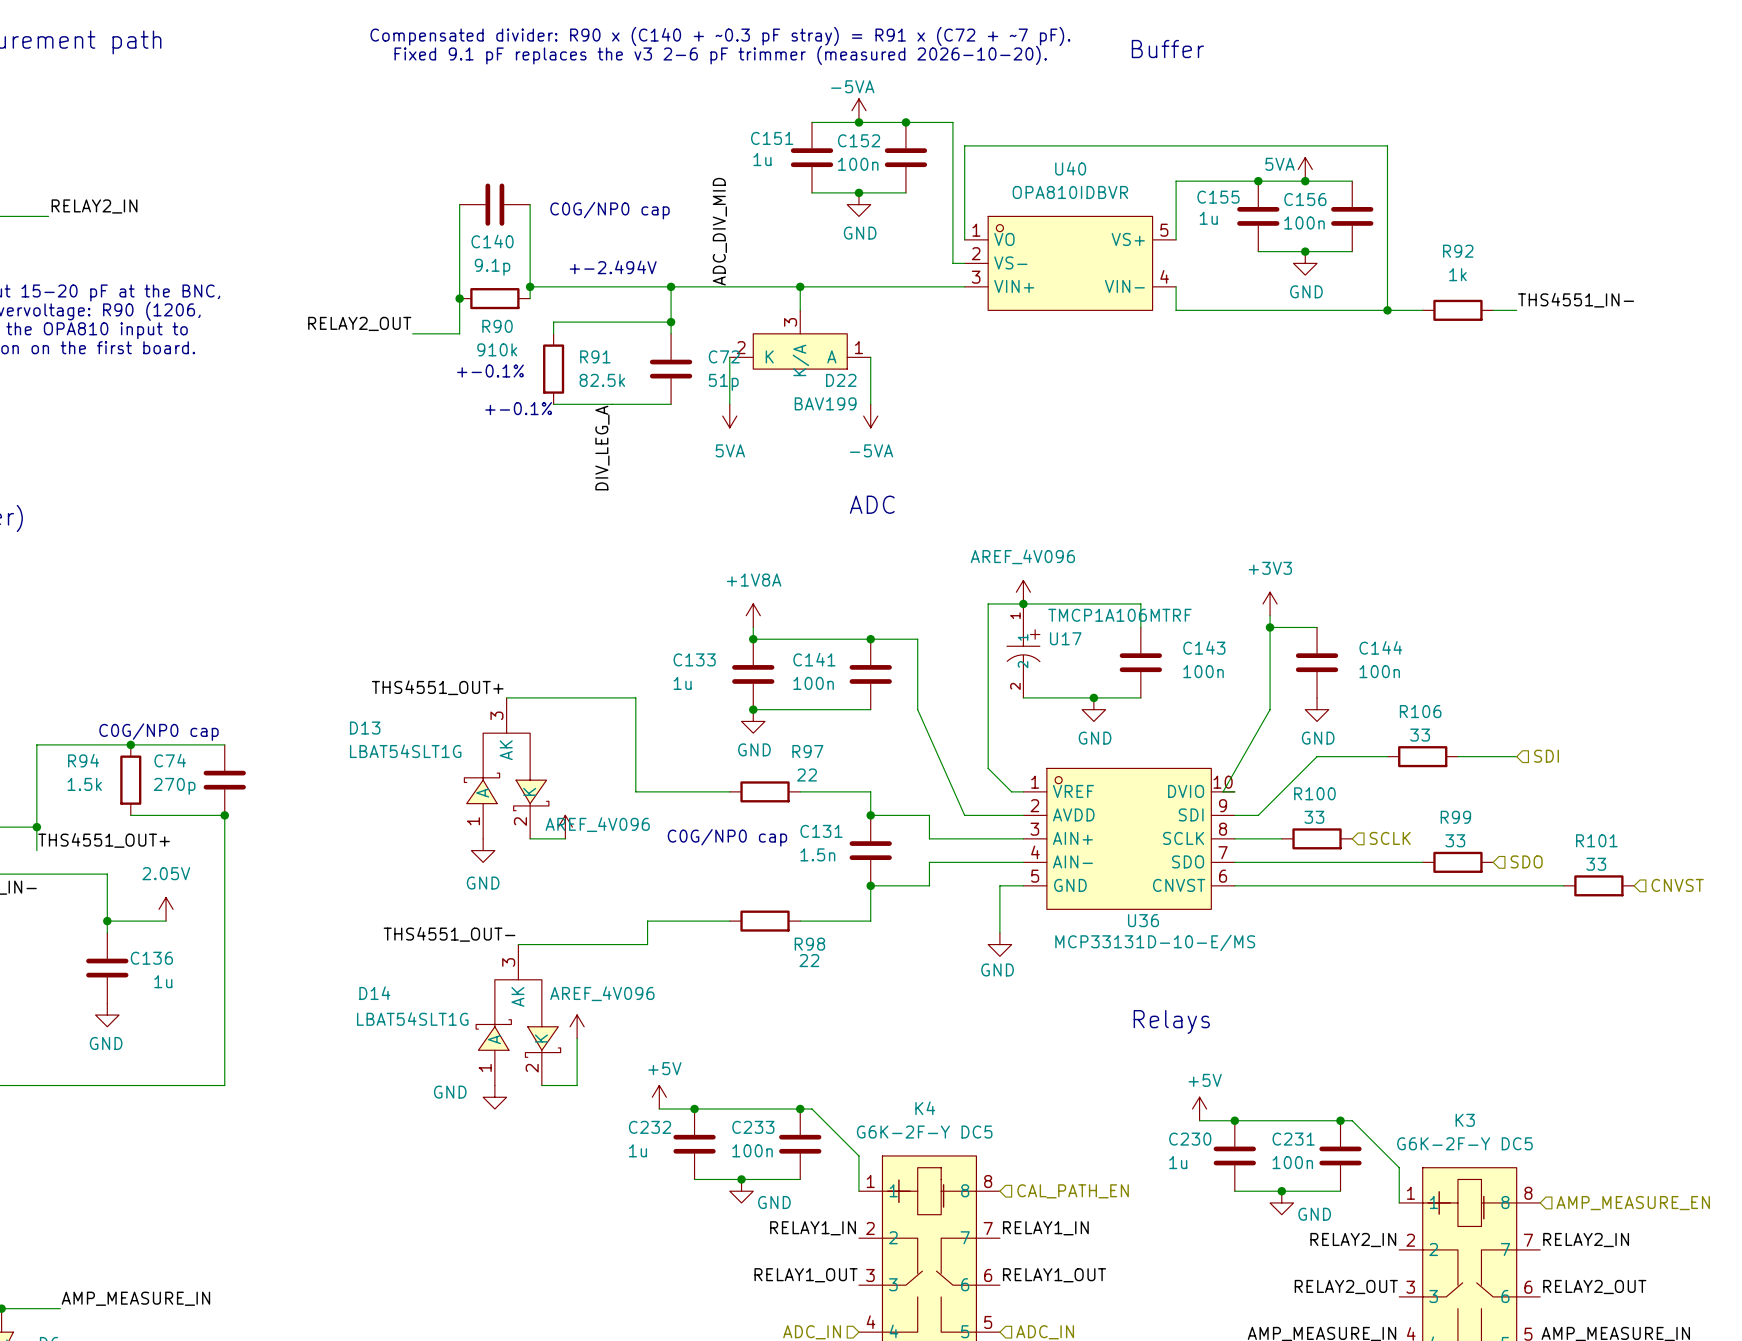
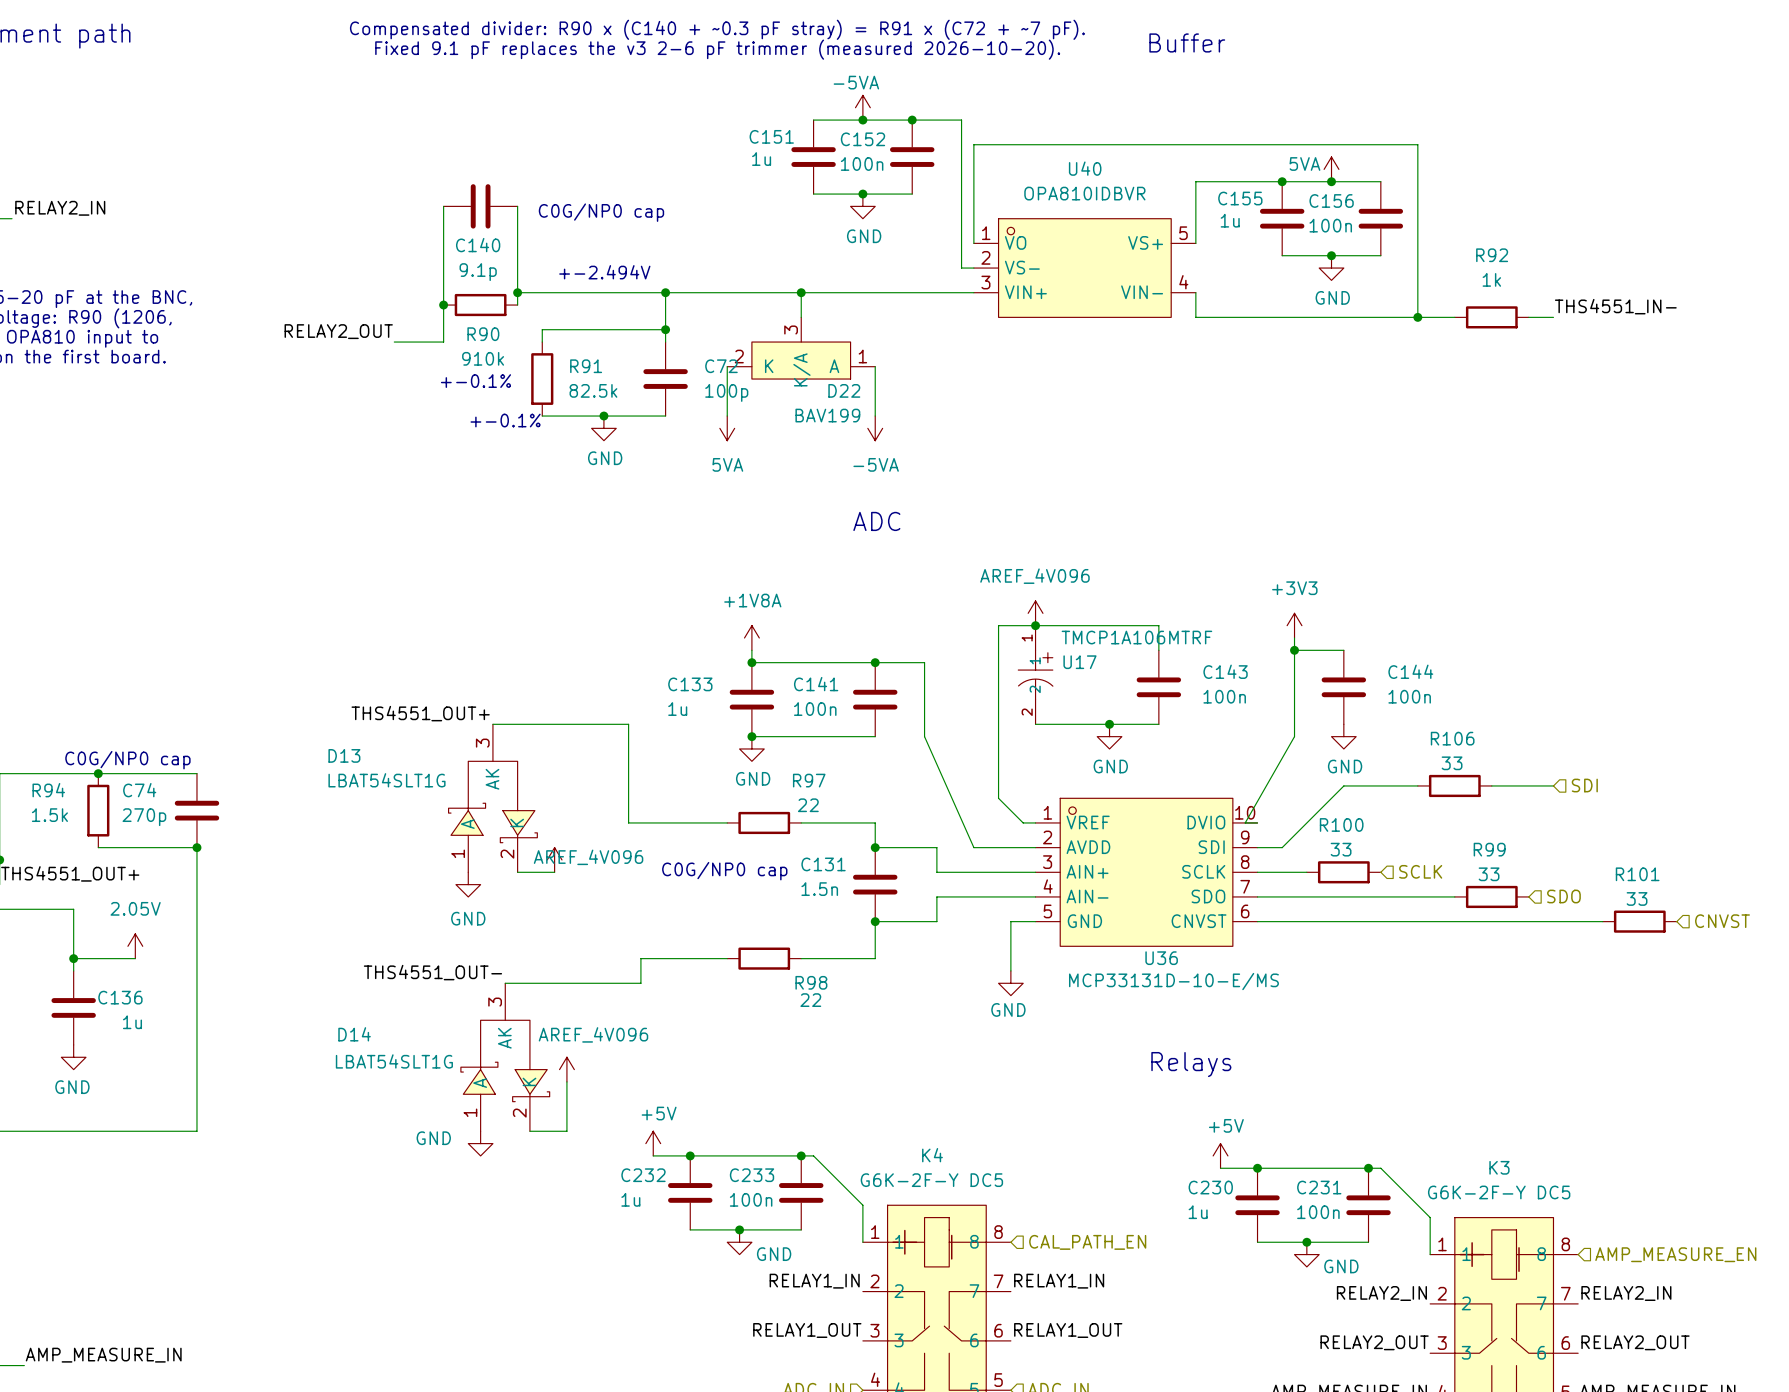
label: ADC_DIV_MID (719, 231) -> none
C72 value: 51p (723, 382) -> 100p (726, 392)
junction: none -> (603, 416)
power symbol: none -> GND (603, 428)
label: DIV_LEG_A (602, 448) -> none

